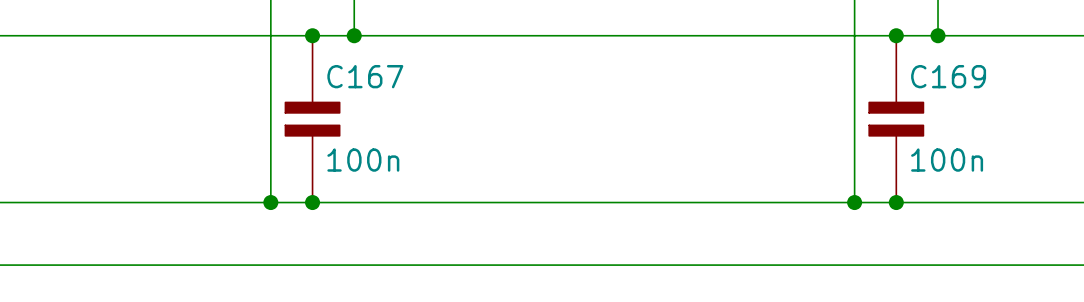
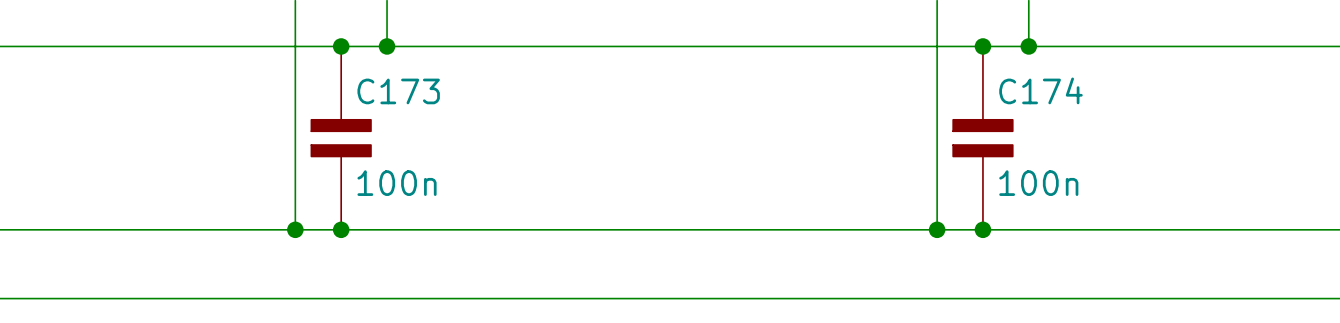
C167 name: C167 (365, 76) -> C173 (398, 91)
C169 name: C169 (948, 76) -> C174 (1040, 90)

